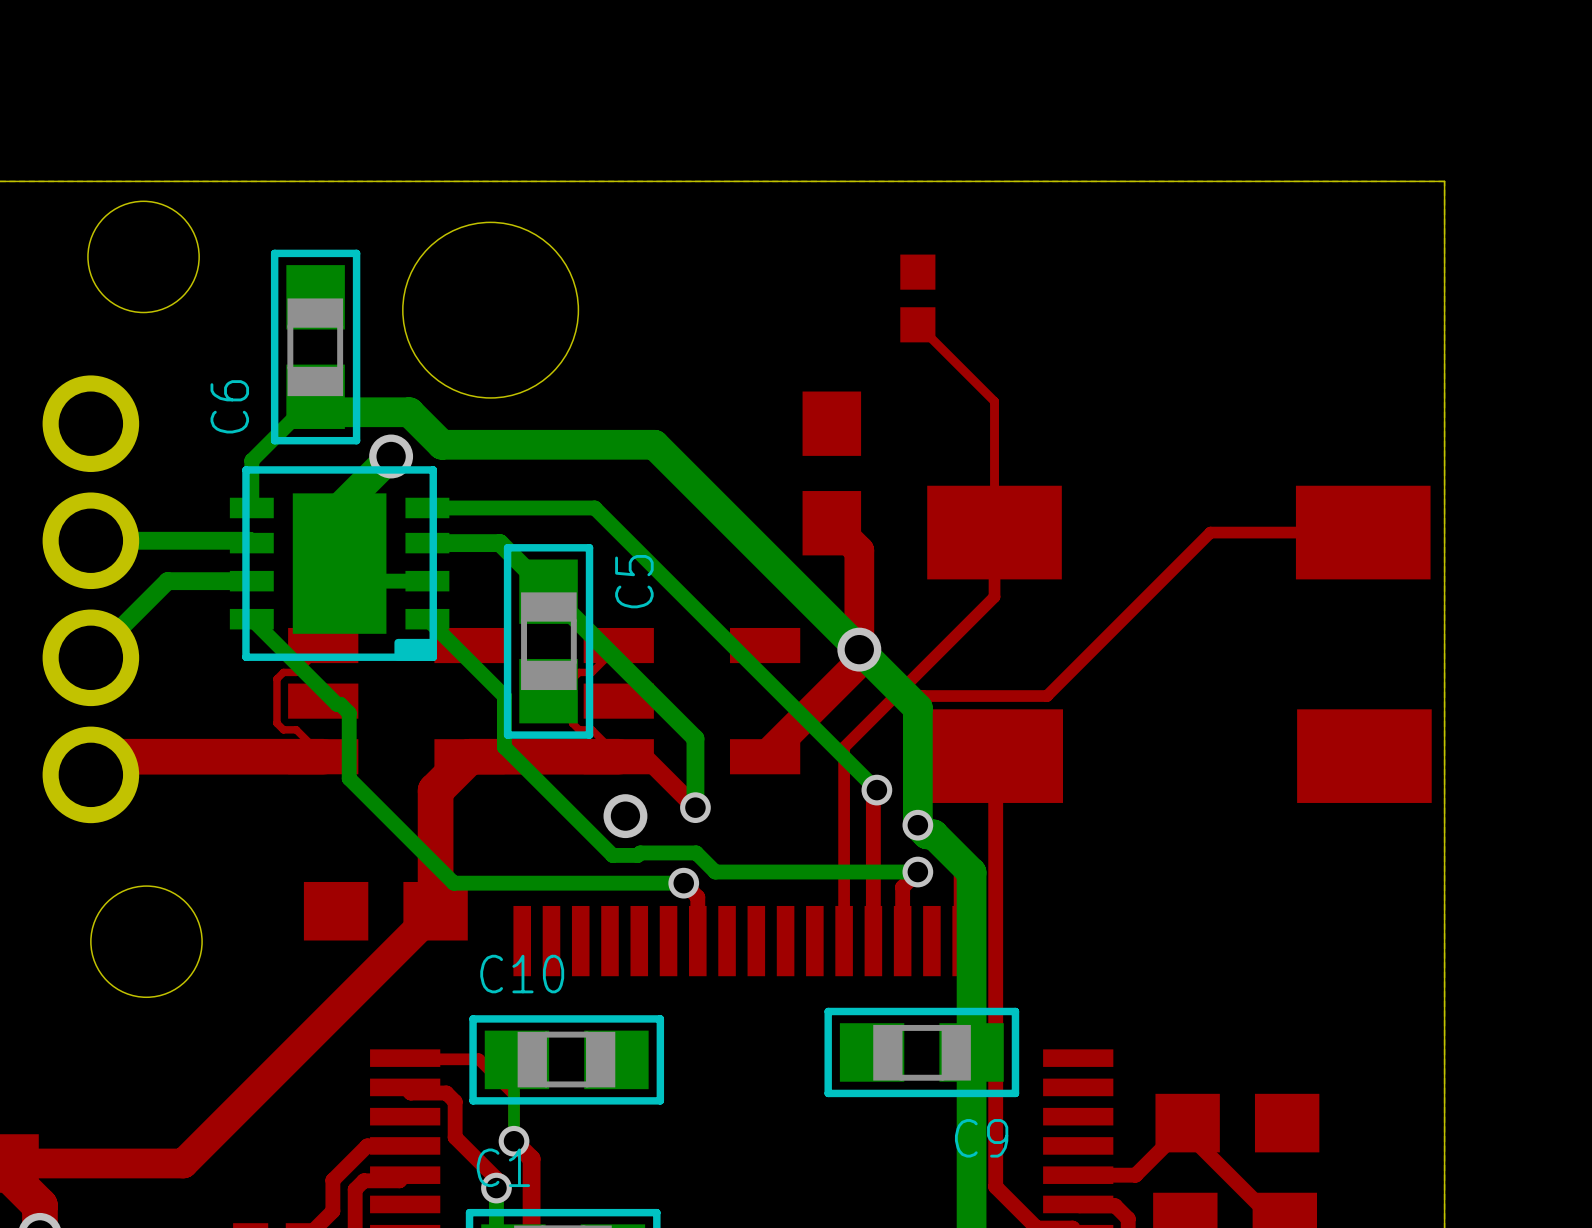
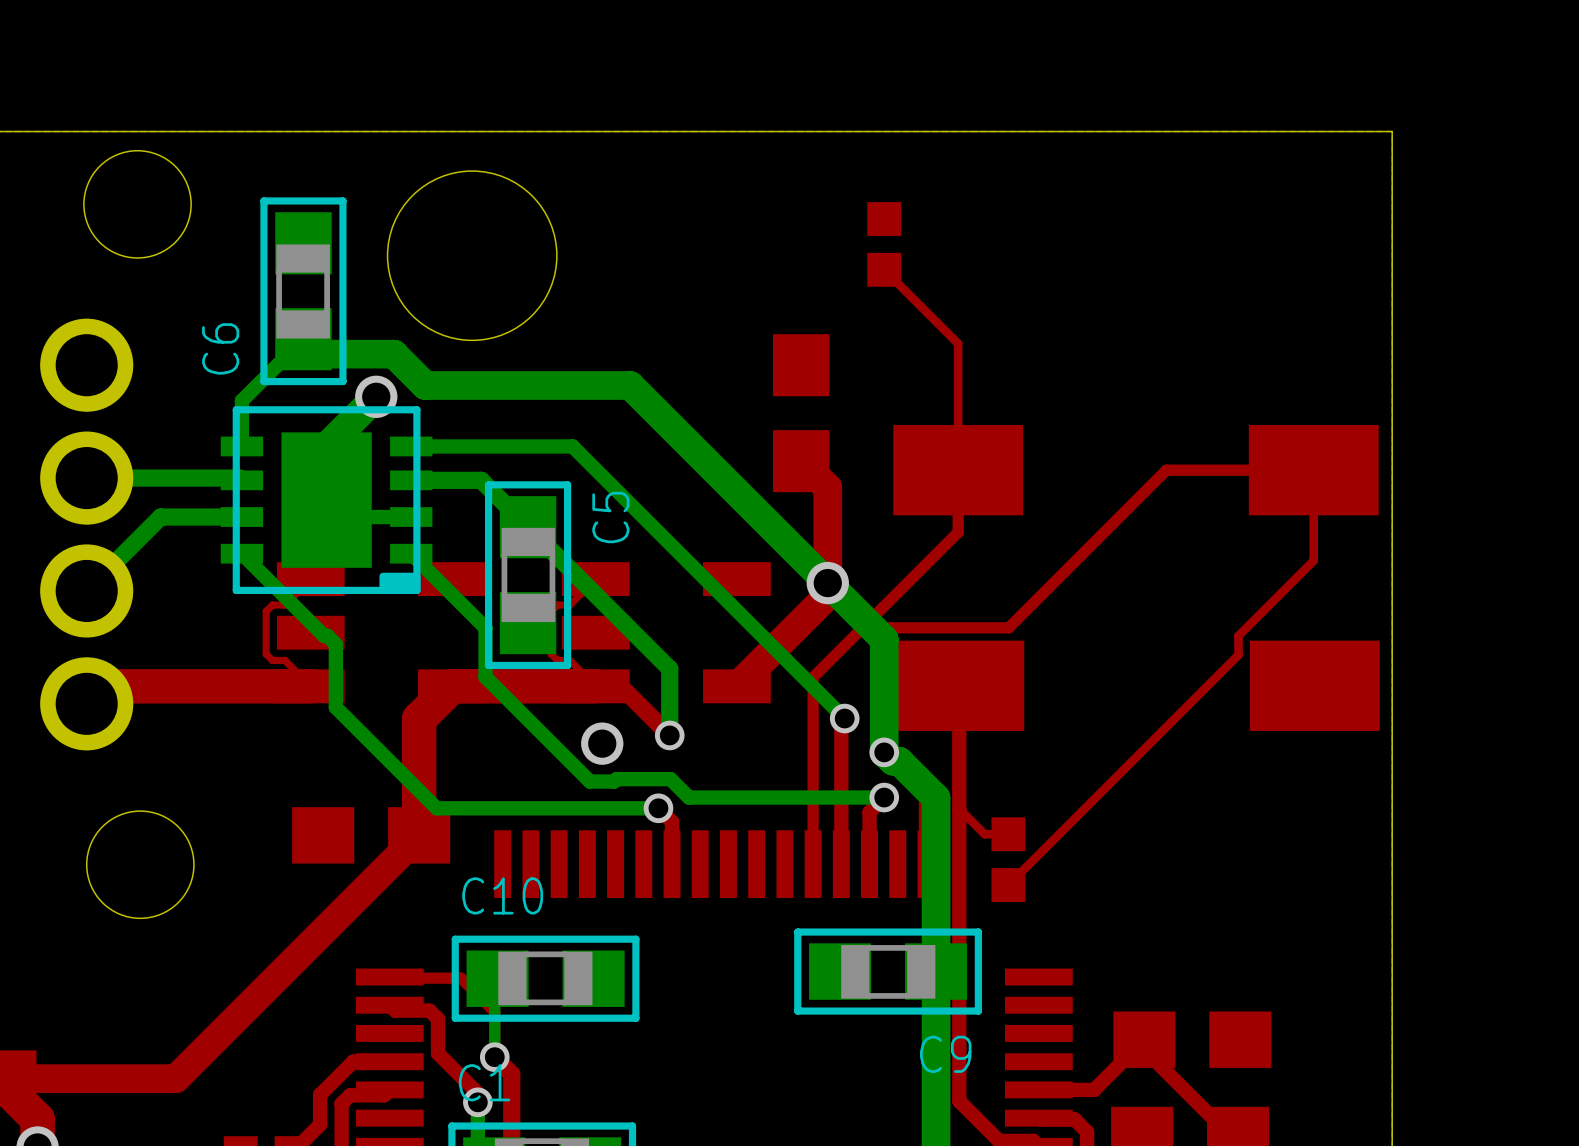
top track: none -> (1313, 470) (1313, 560) (1238, 635) (1238, 654) (1008, 885)
top track: none -> (959, 808) (984, 834) (1008, 834)
part: none -> (1008, 859)

